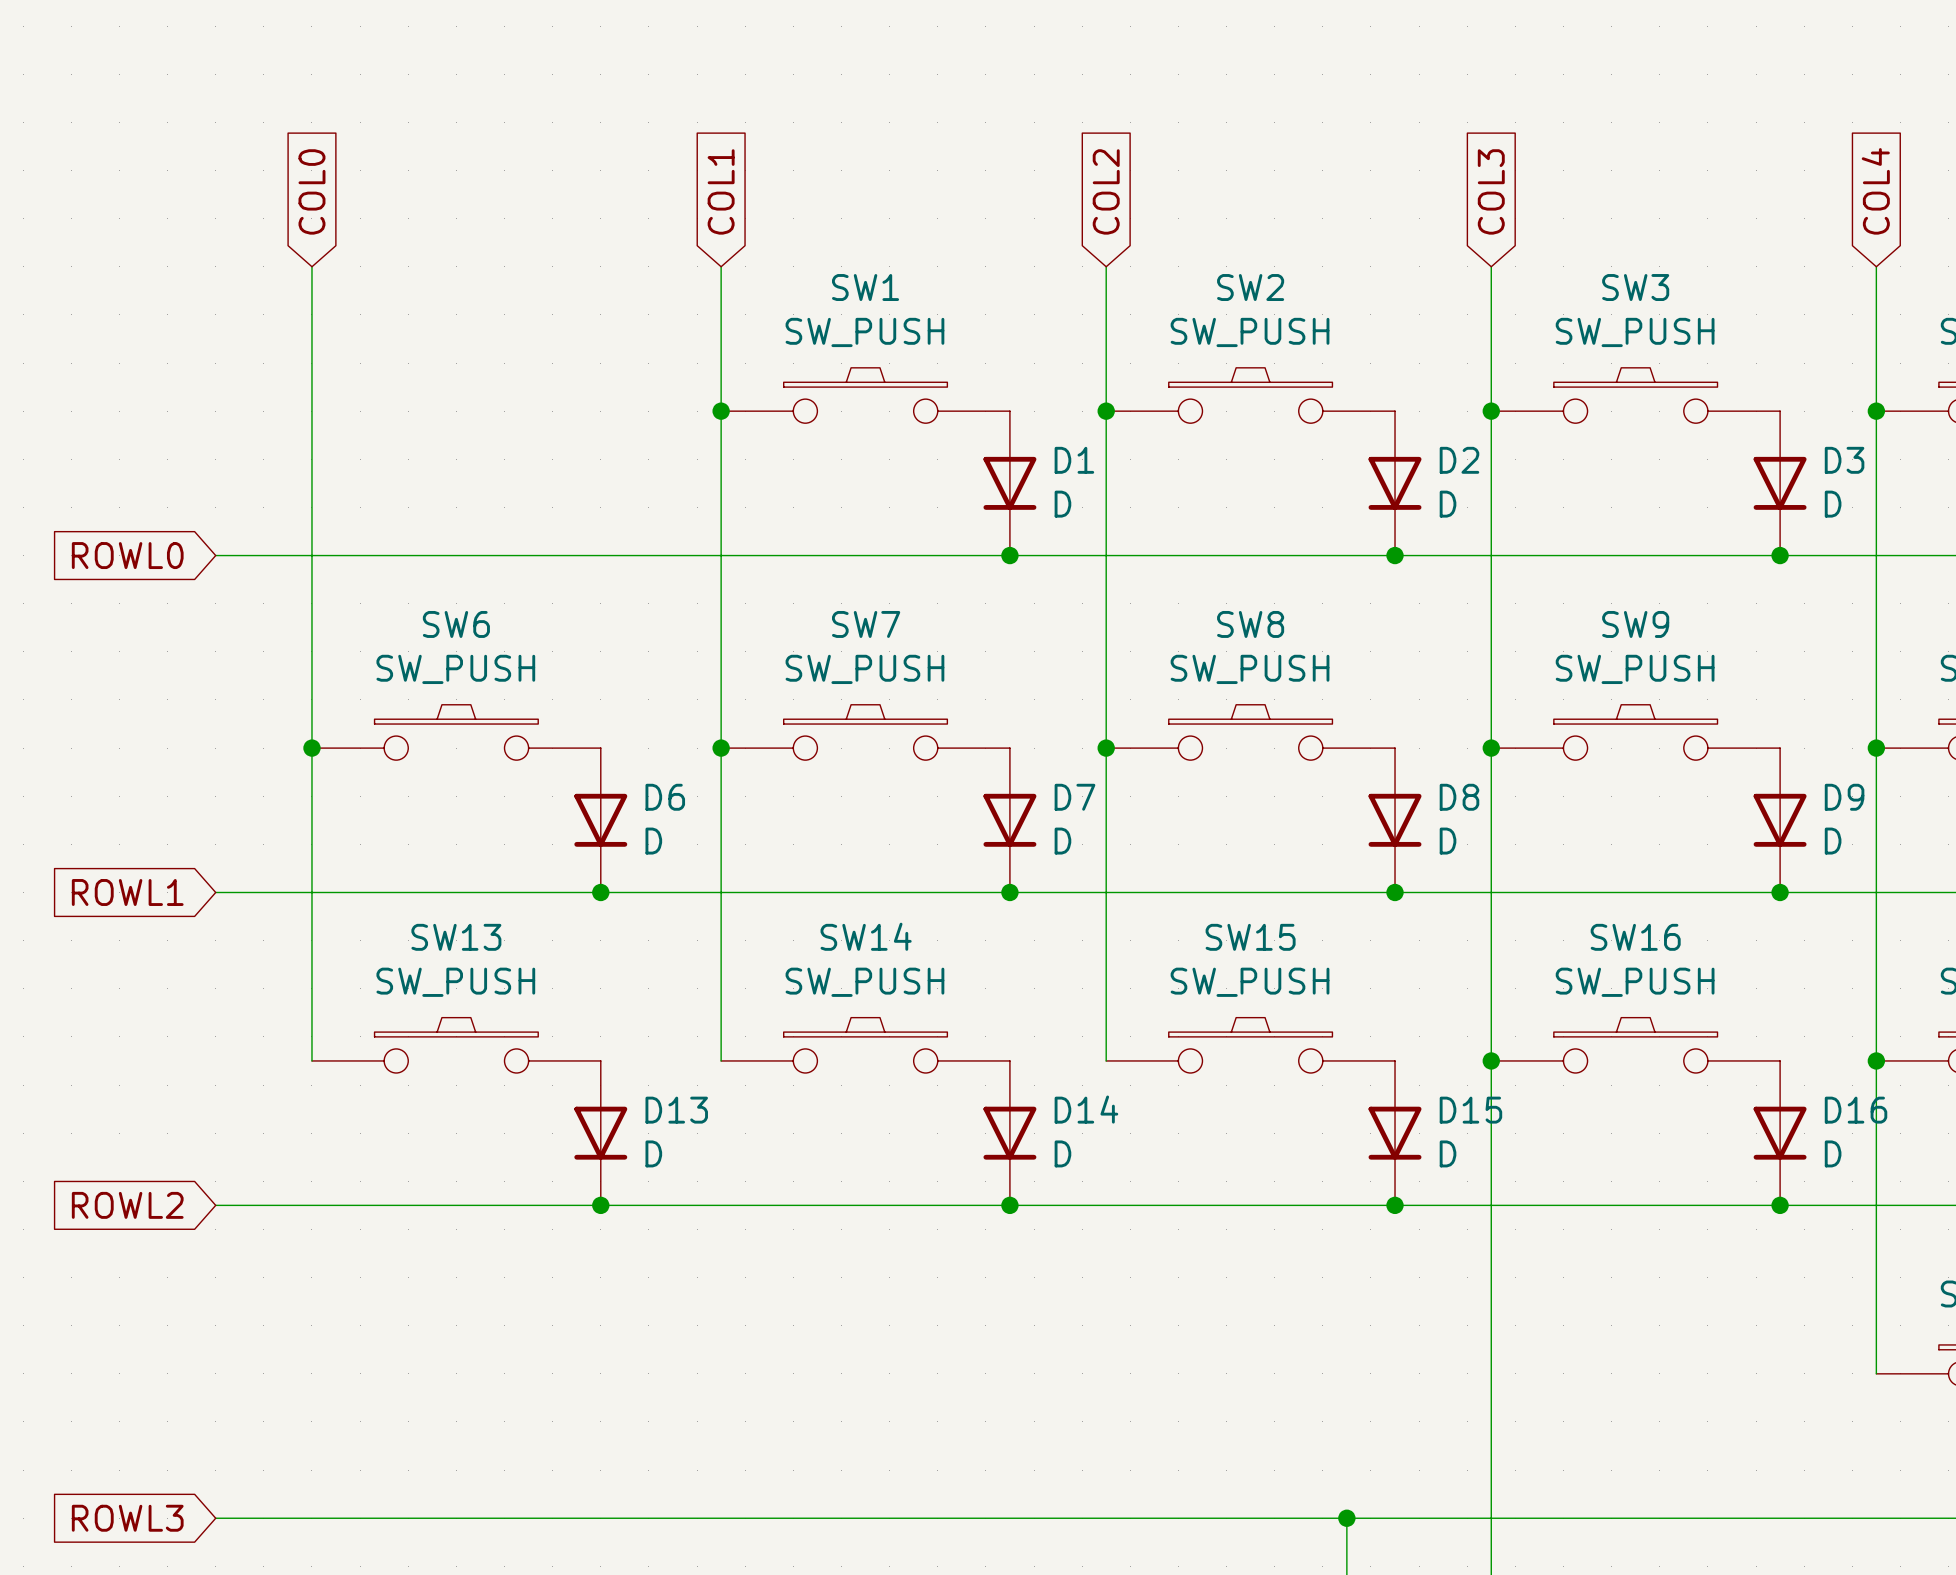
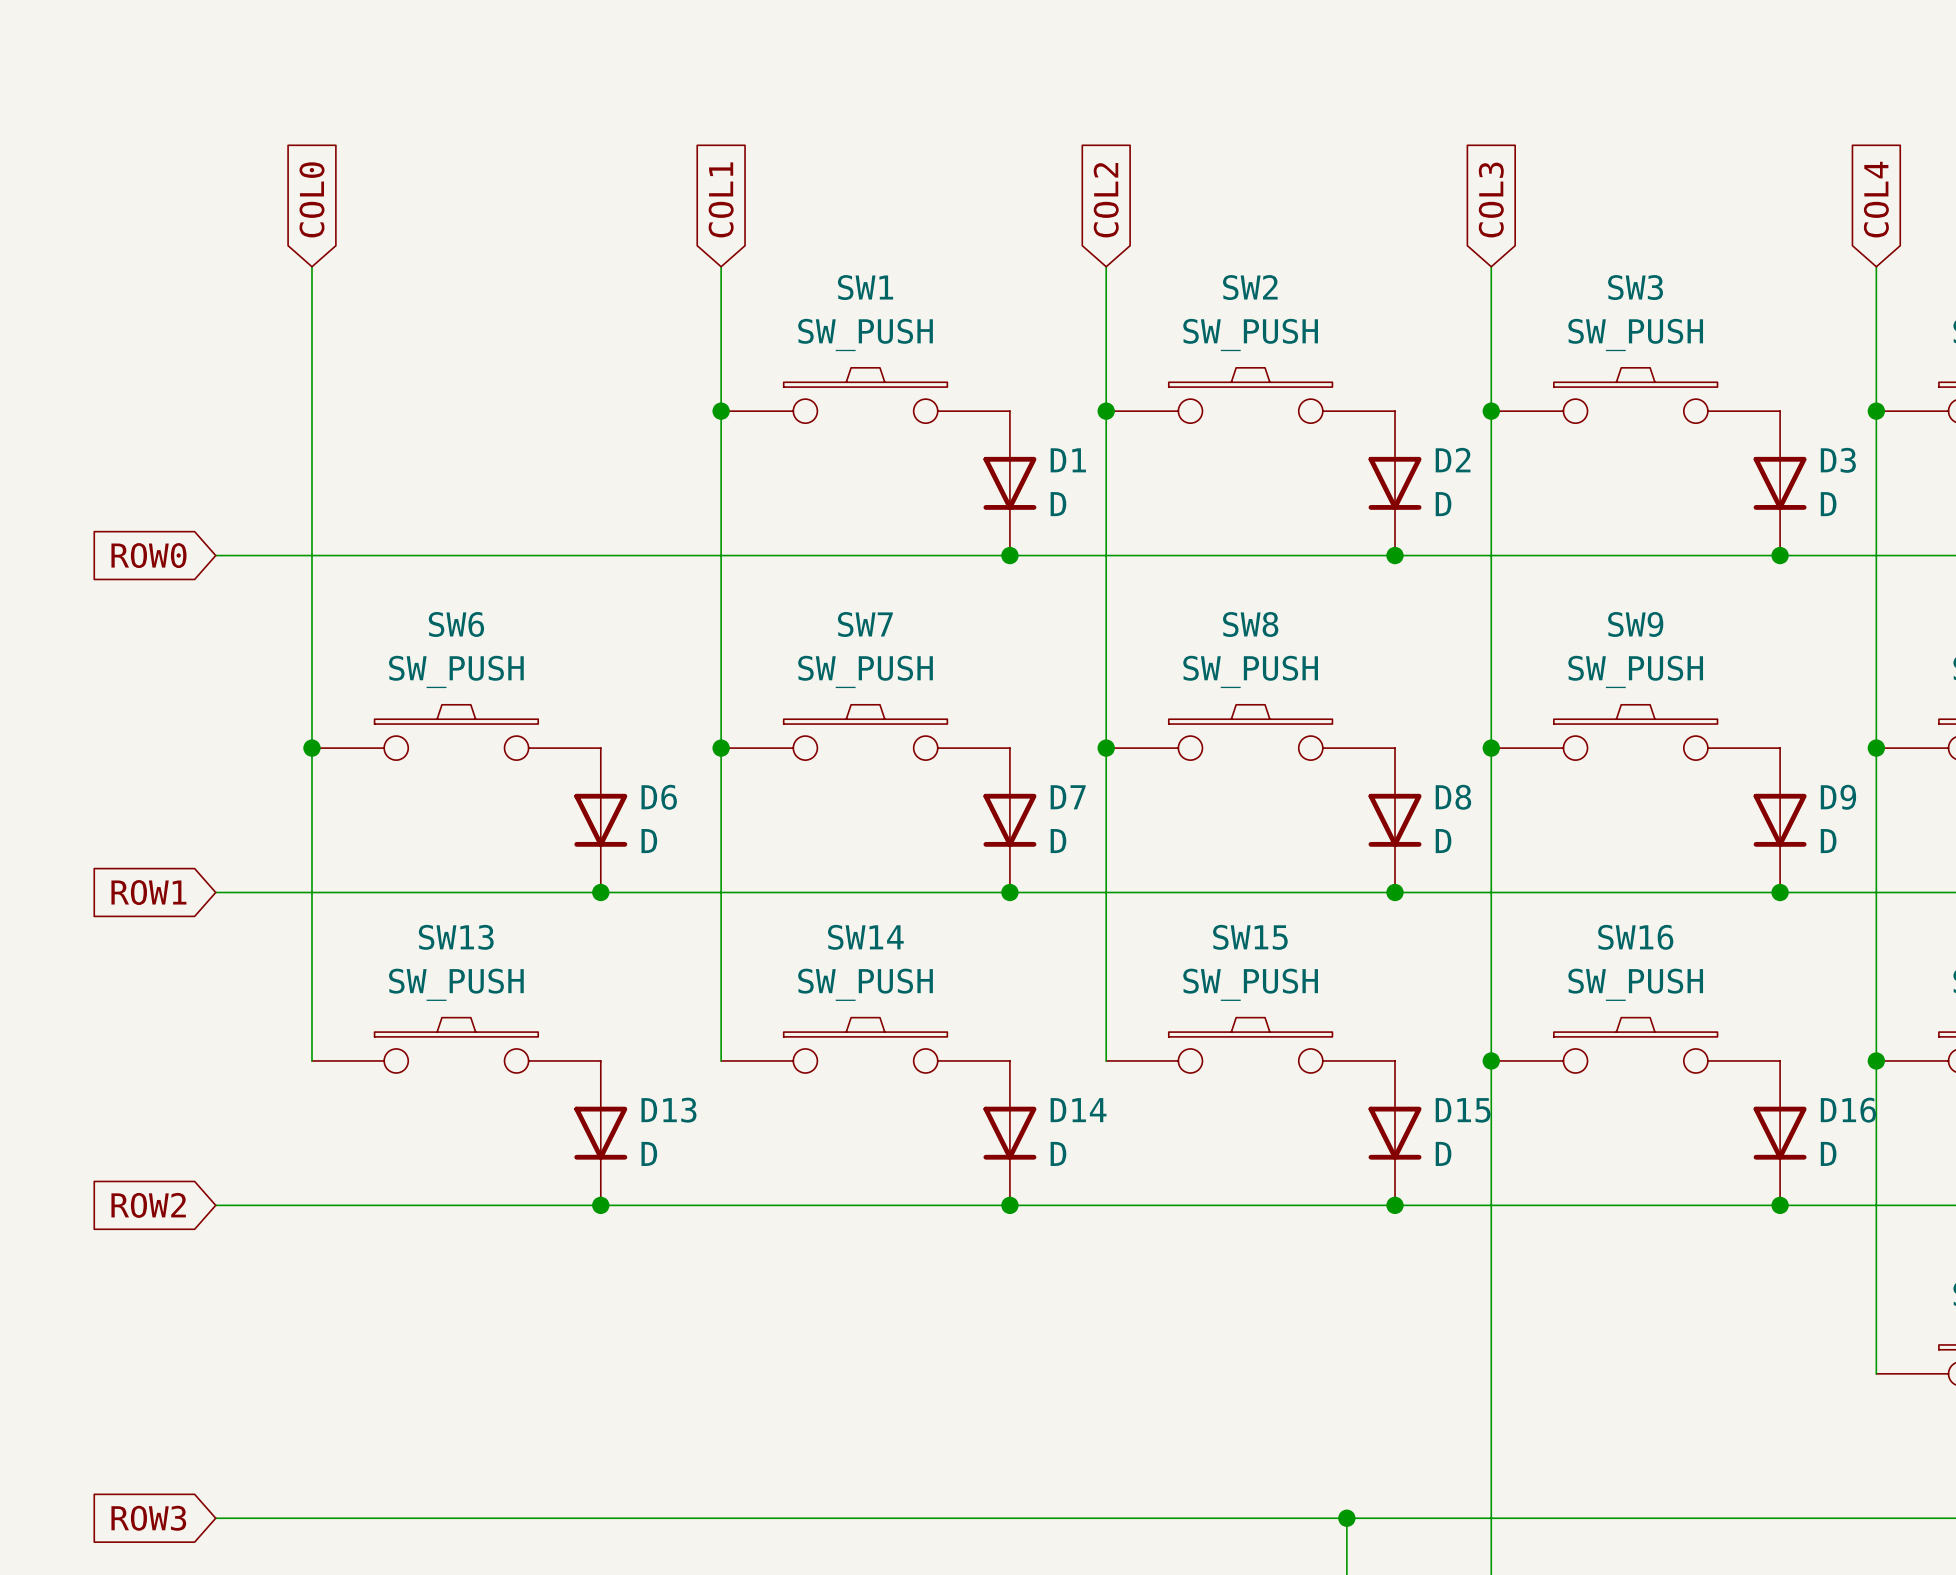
global label: ROWL0 (127, 555) -> ROW0 (148, 555)
global label: ROWL1 (127, 892) -> ROW1 (148, 892)
global label: ROWL2 (127, 1205) -> ROW2 (148, 1205)
global label: ROWL3 (127, 1518) -> ROW3 (148, 1518)

